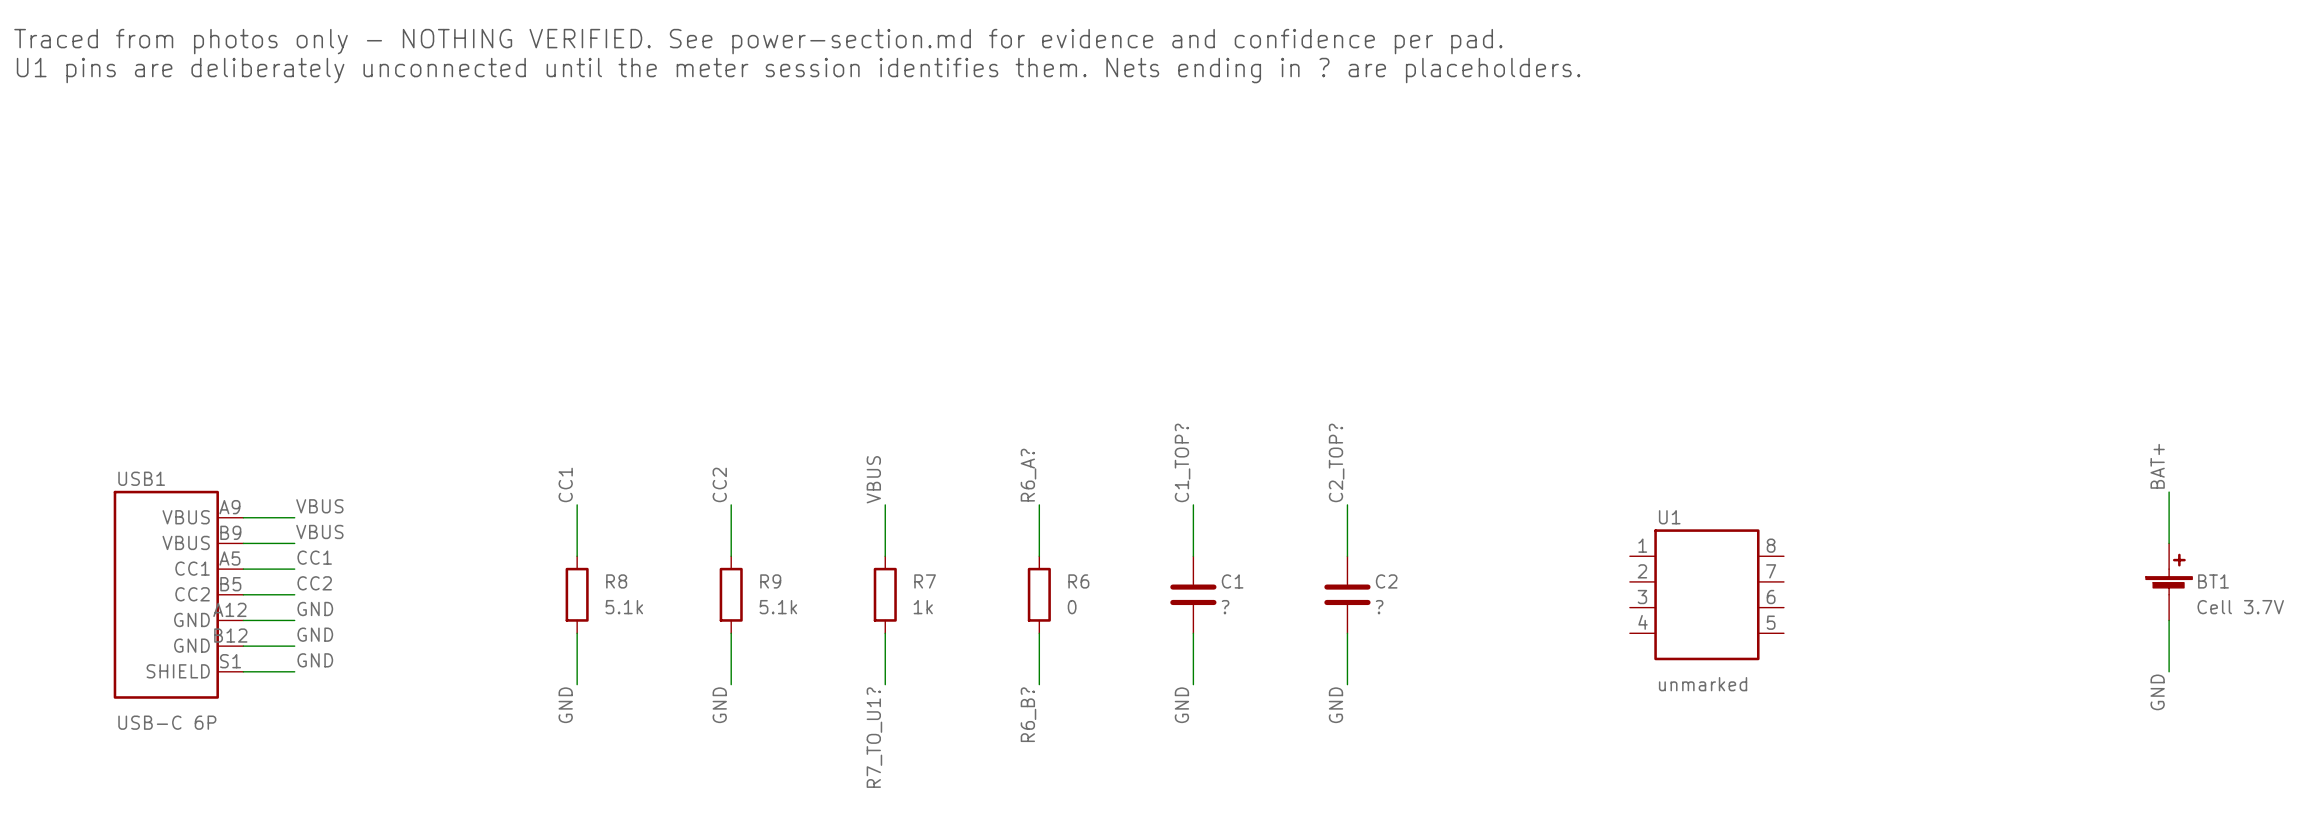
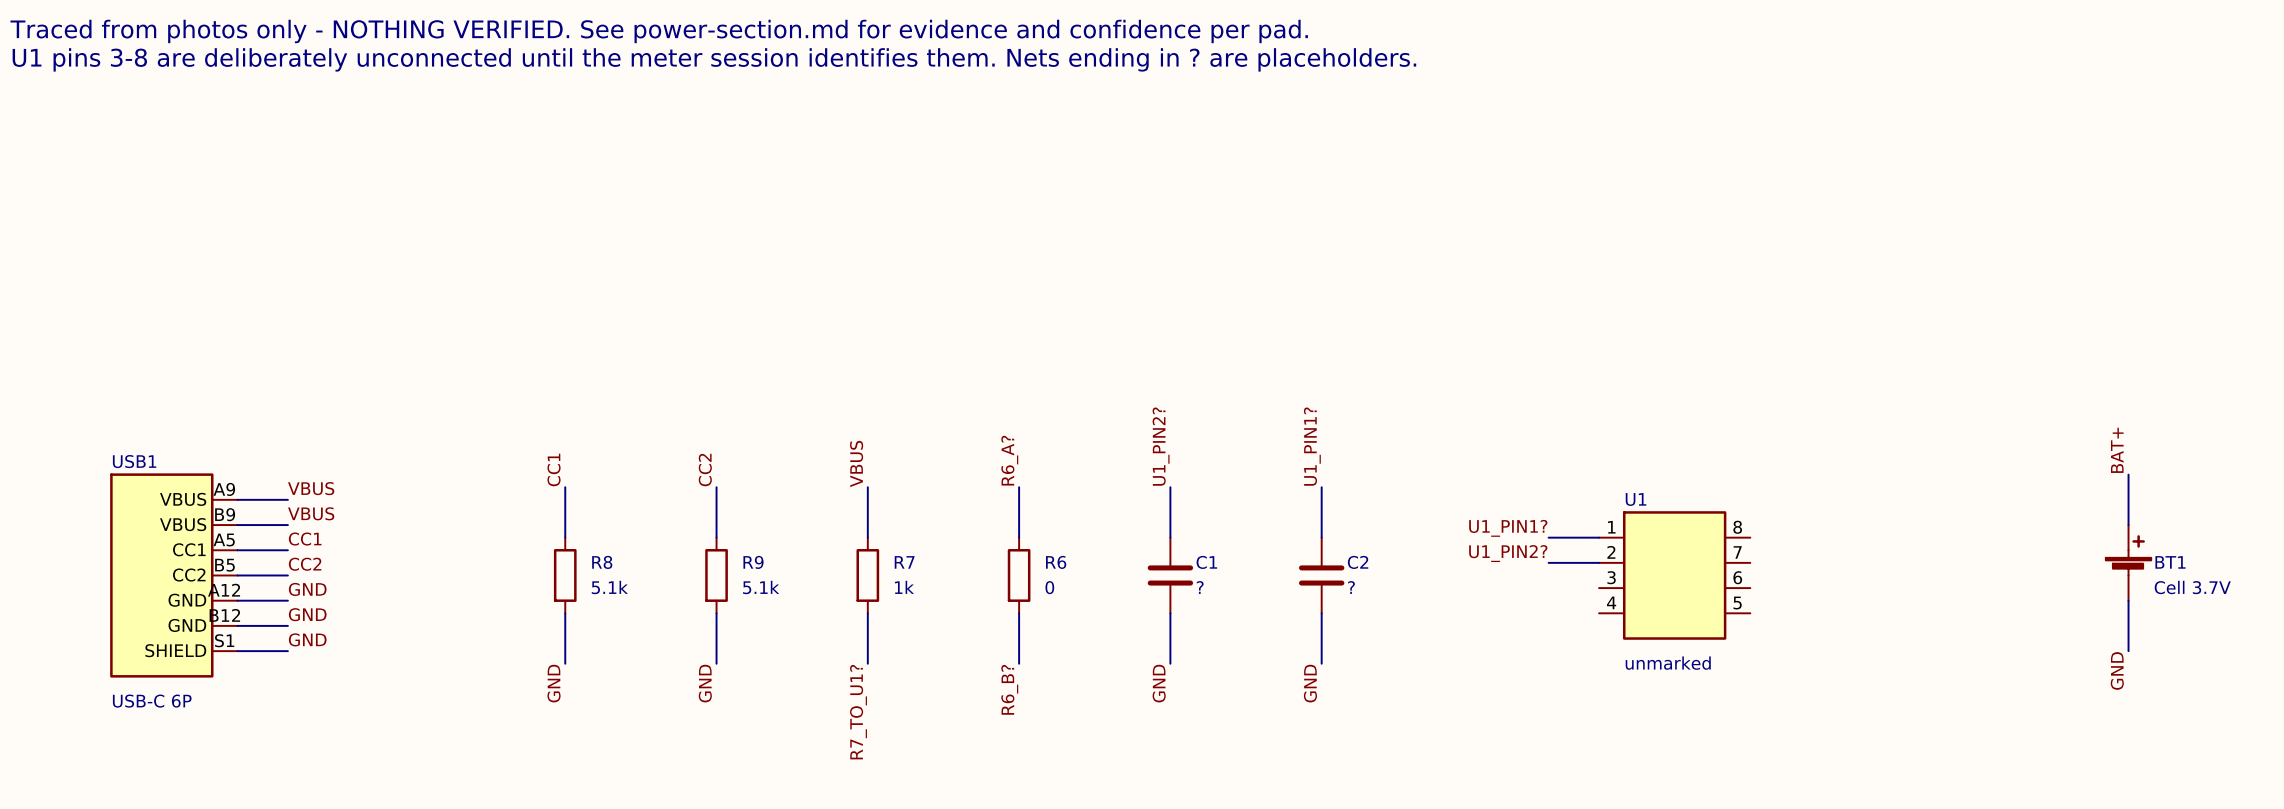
text: U1 pins are deliberately unconnected until the meter session identifies them. Nets ending in ? are placeholders. (798, 70) -> U1 pins 3-8 are deliberately unconnected until the meter session identifies them. Nets ending in ? are placeholders. (714, 59)
label: C1_TOP? (1182, 462) -> U1_PIN2? (1161, 446)
label: C2_TOP? (1336, 462) -> U1_PIN1? (1312, 446)
label: none -> U1_PIN1? (1508, 528)
wire: none -> (1548, 537) (1599, 537)
label: none -> U1_PIN2? (1508, 553)
wire: none -> (1548, 562) (1599, 562)

